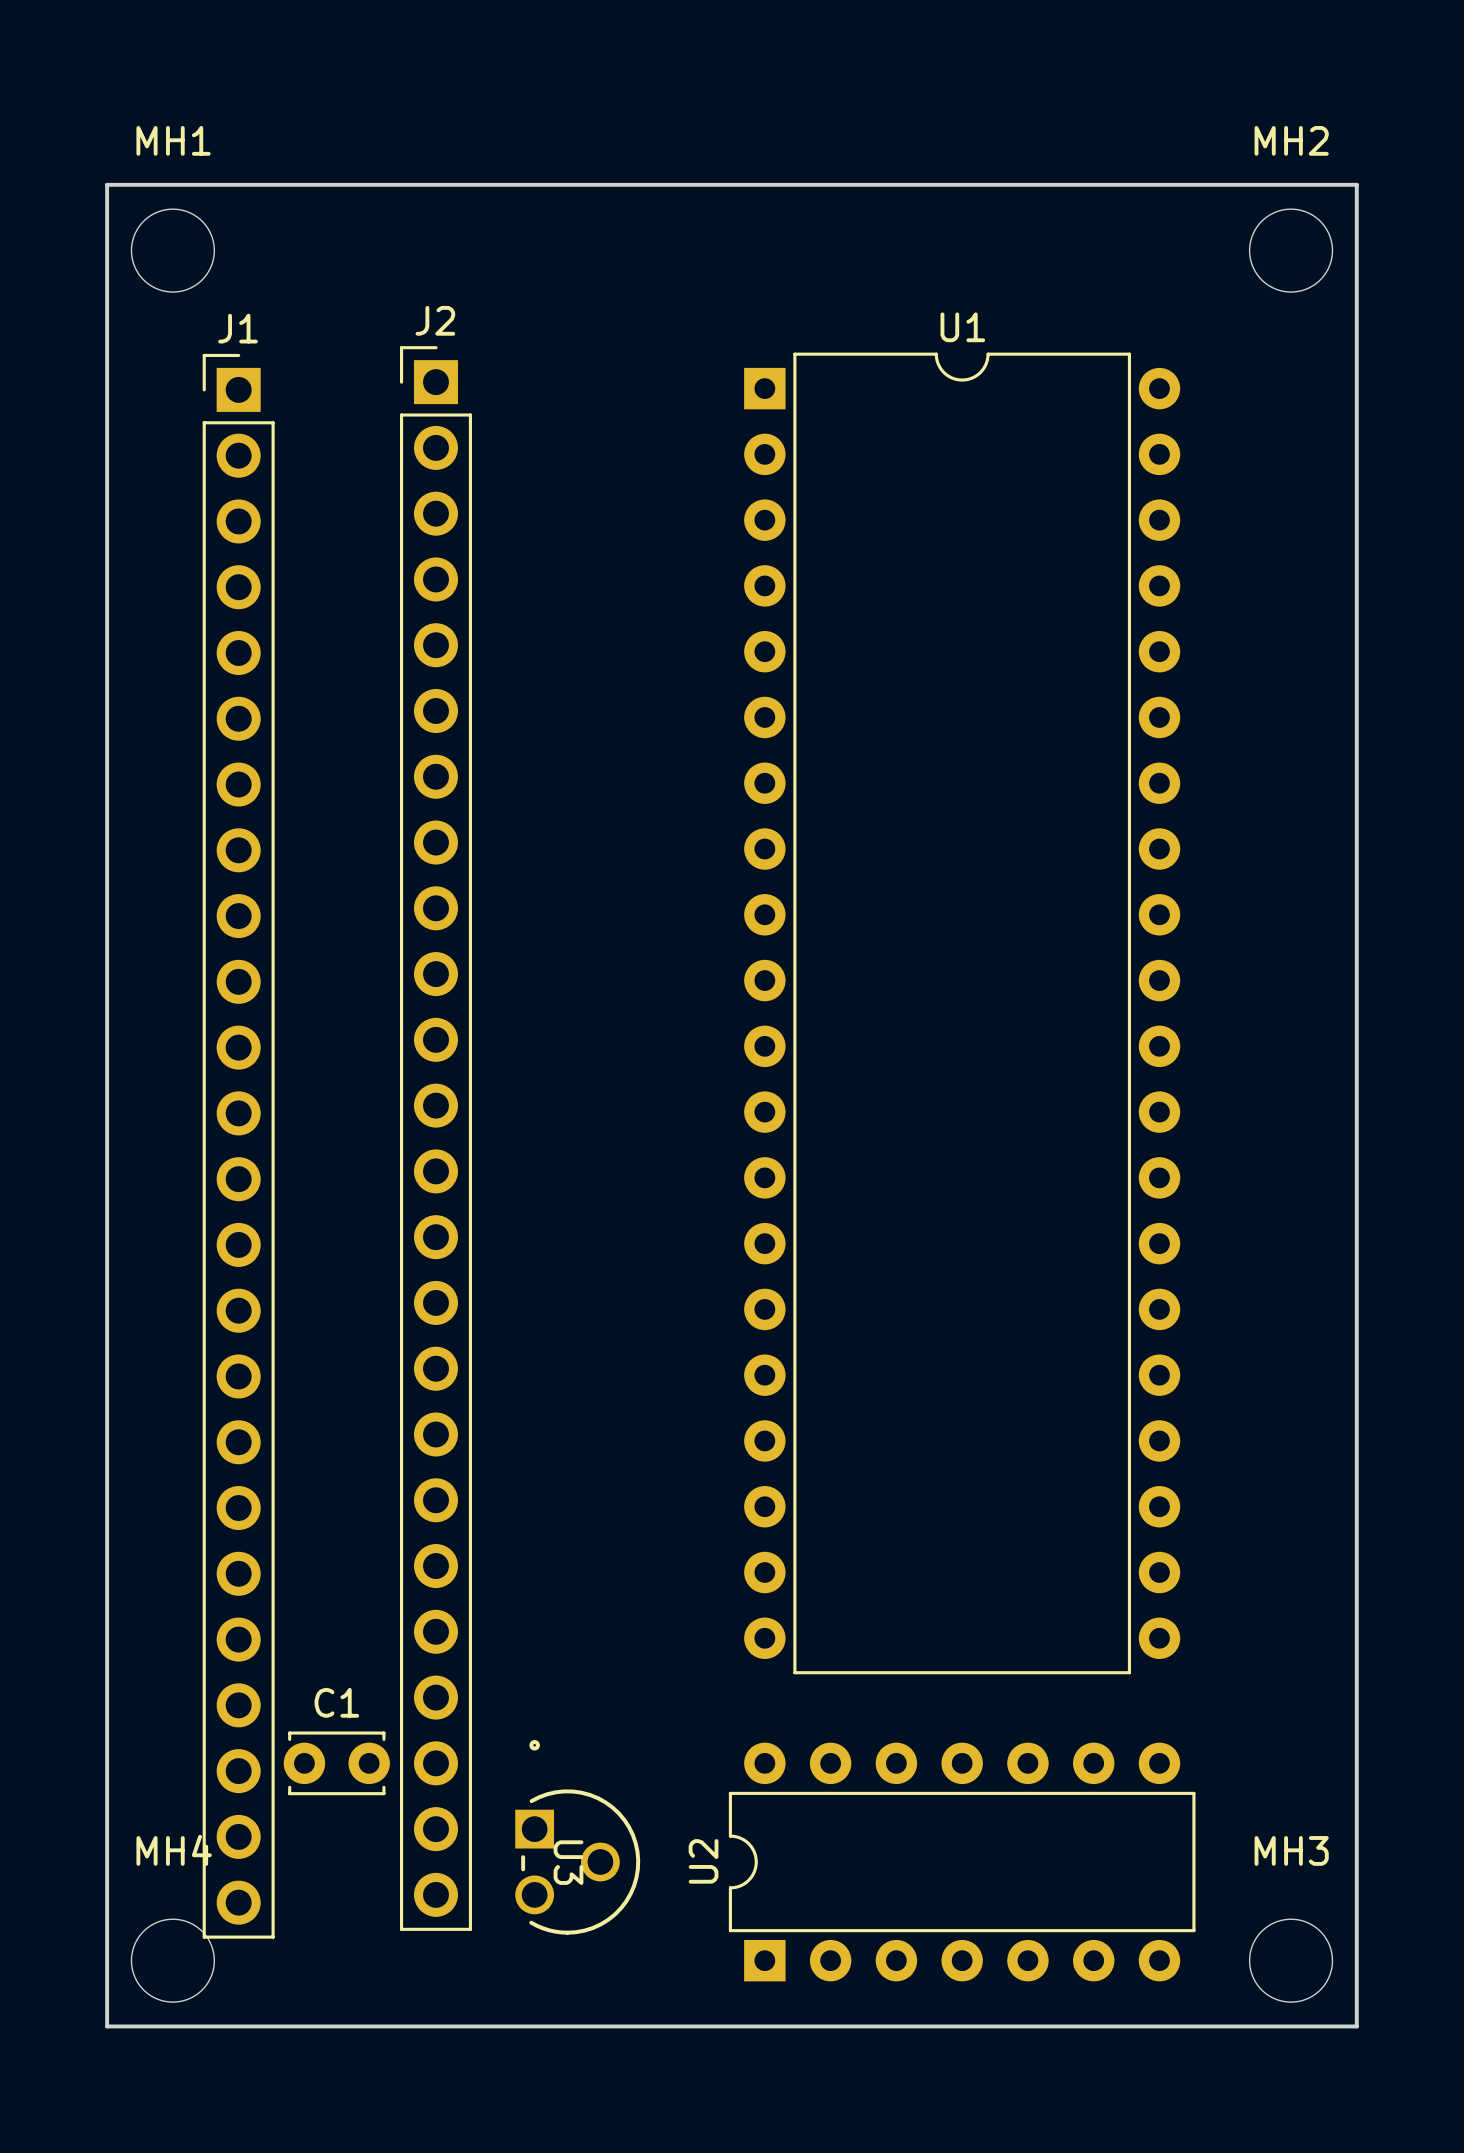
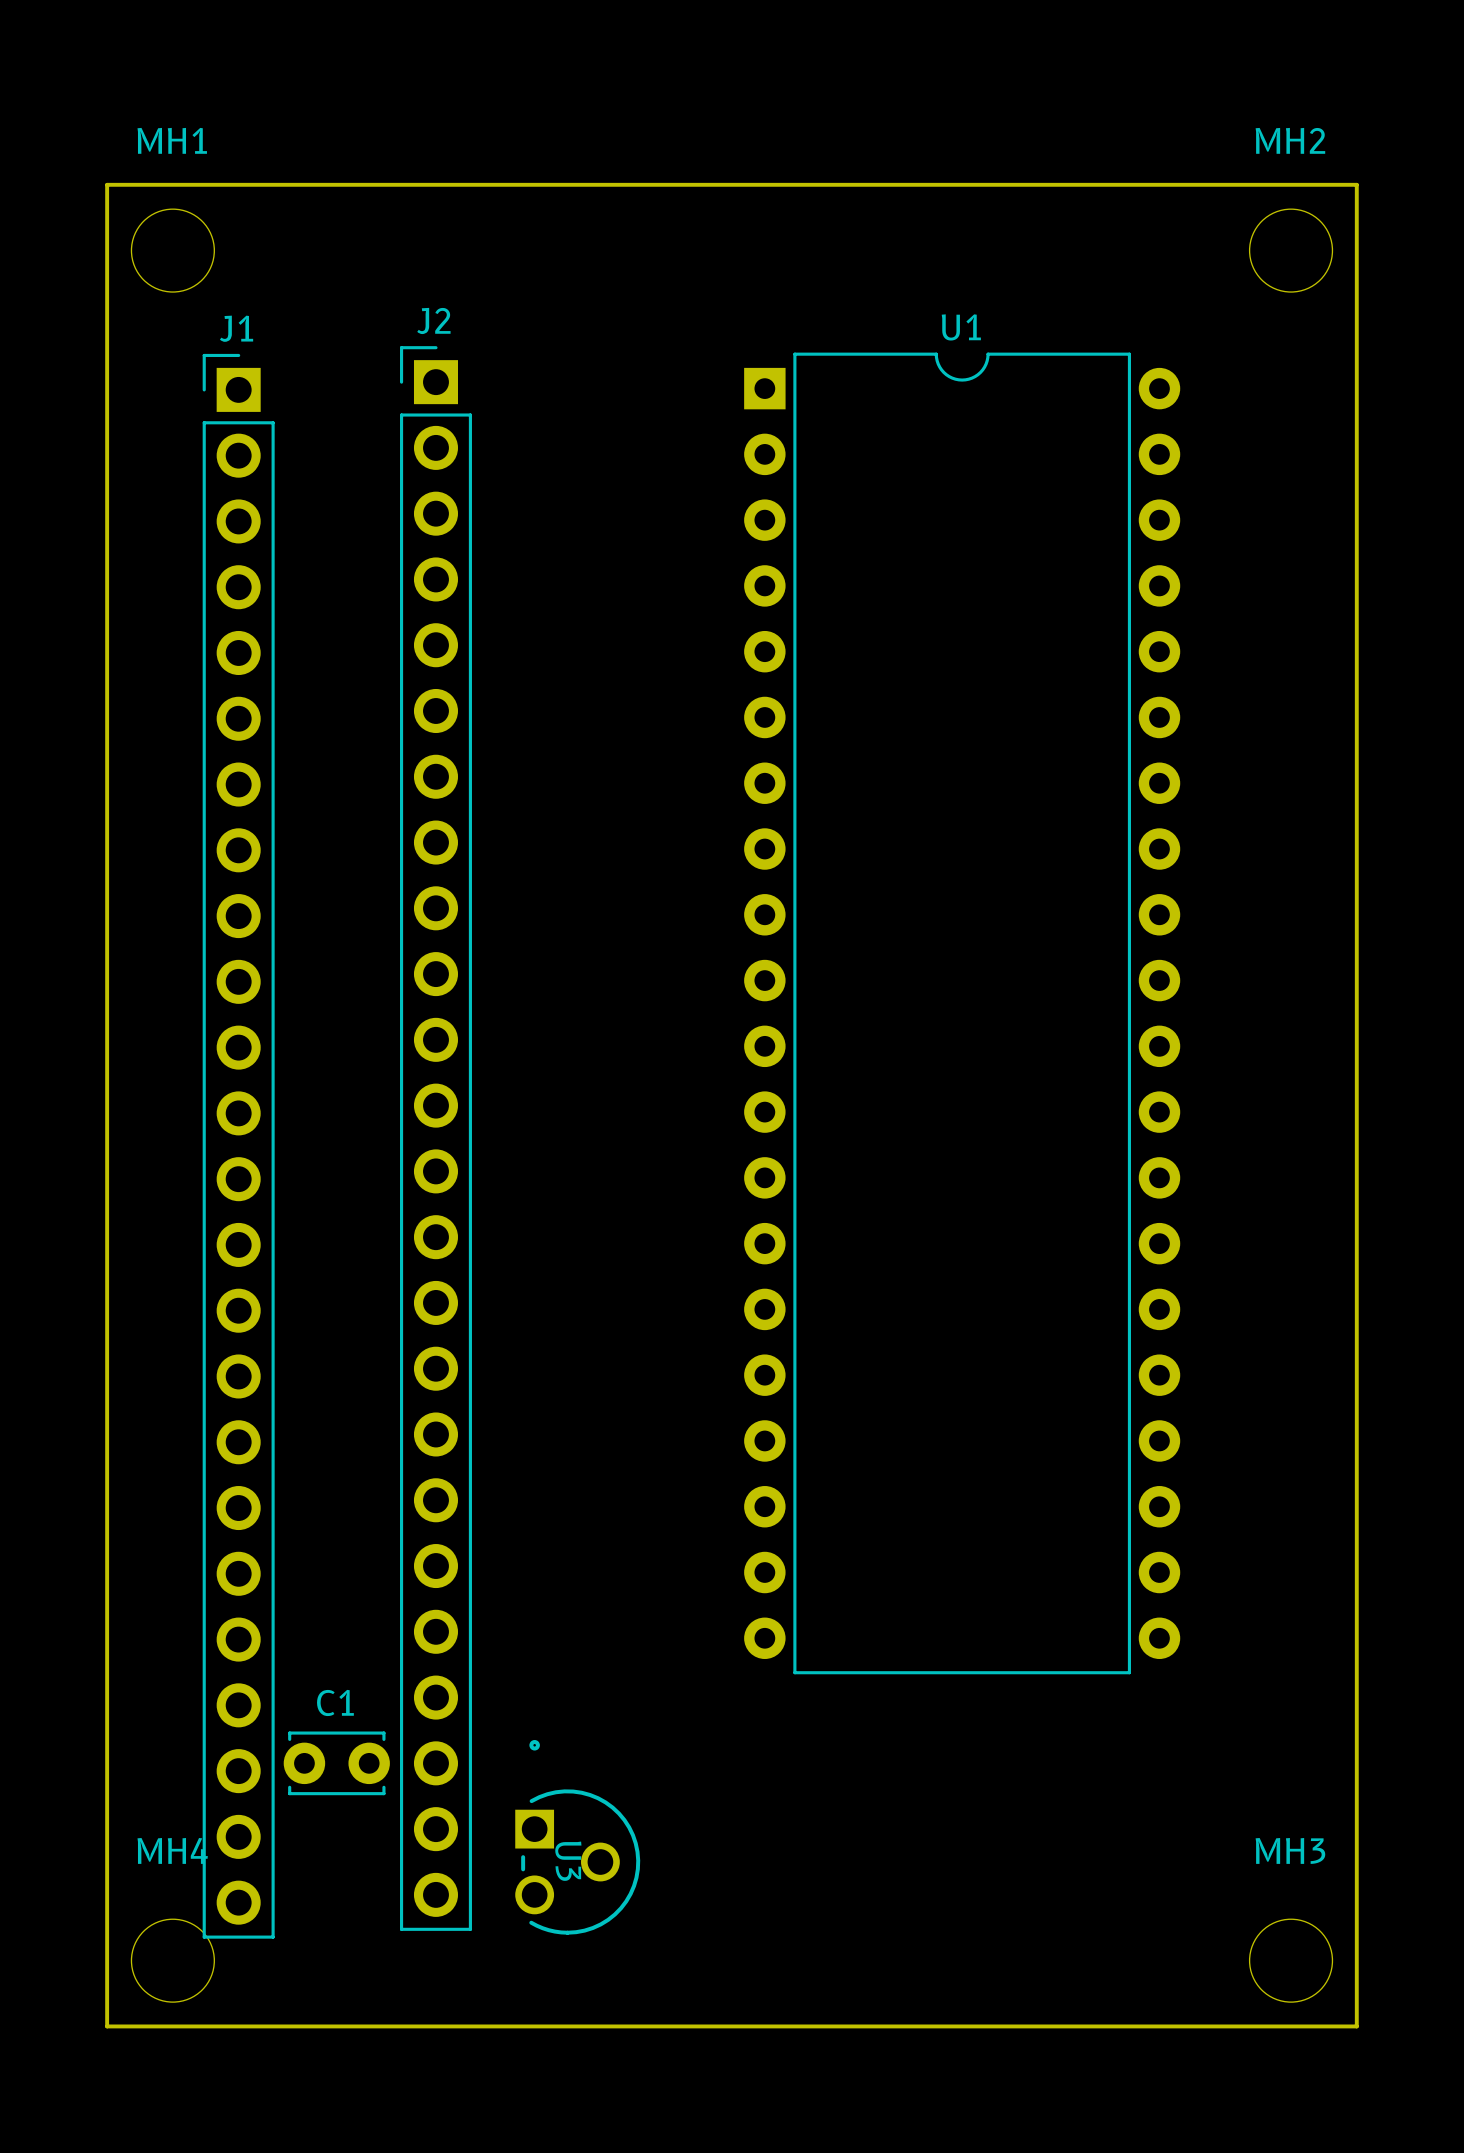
U2: (962, 1862) -> none

